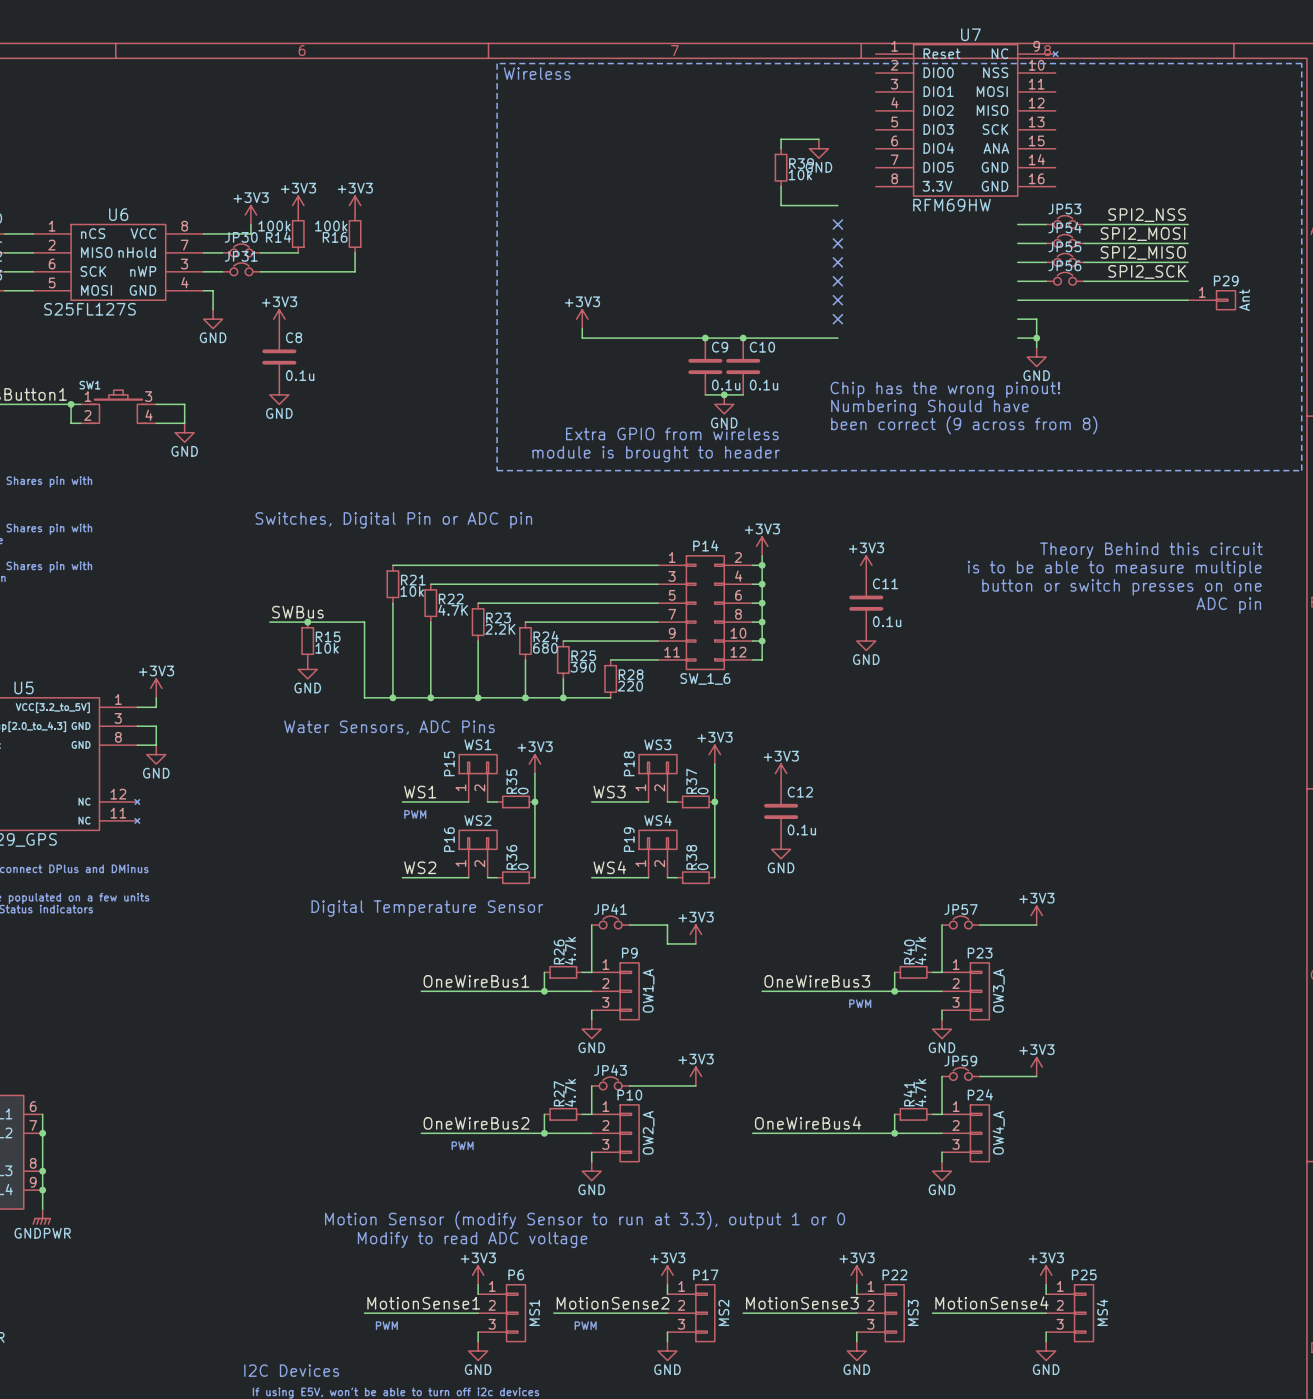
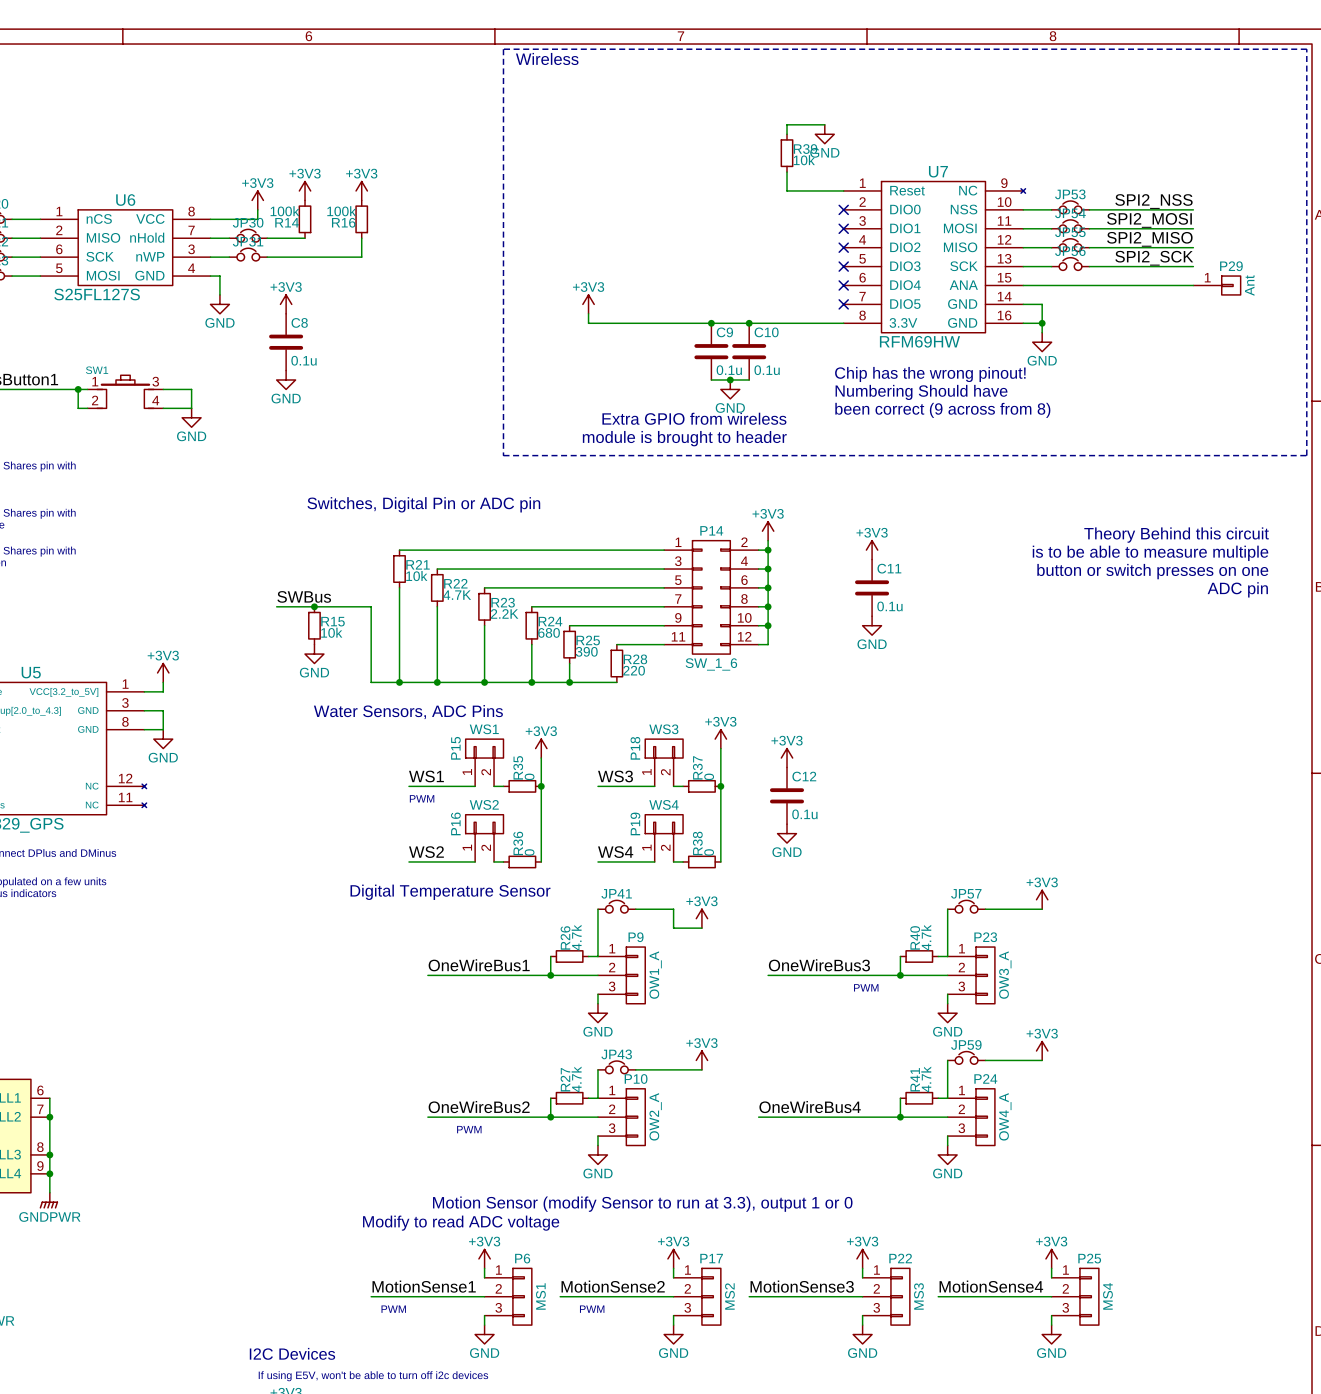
U7 position: (966, 120) -> (934, 257)

